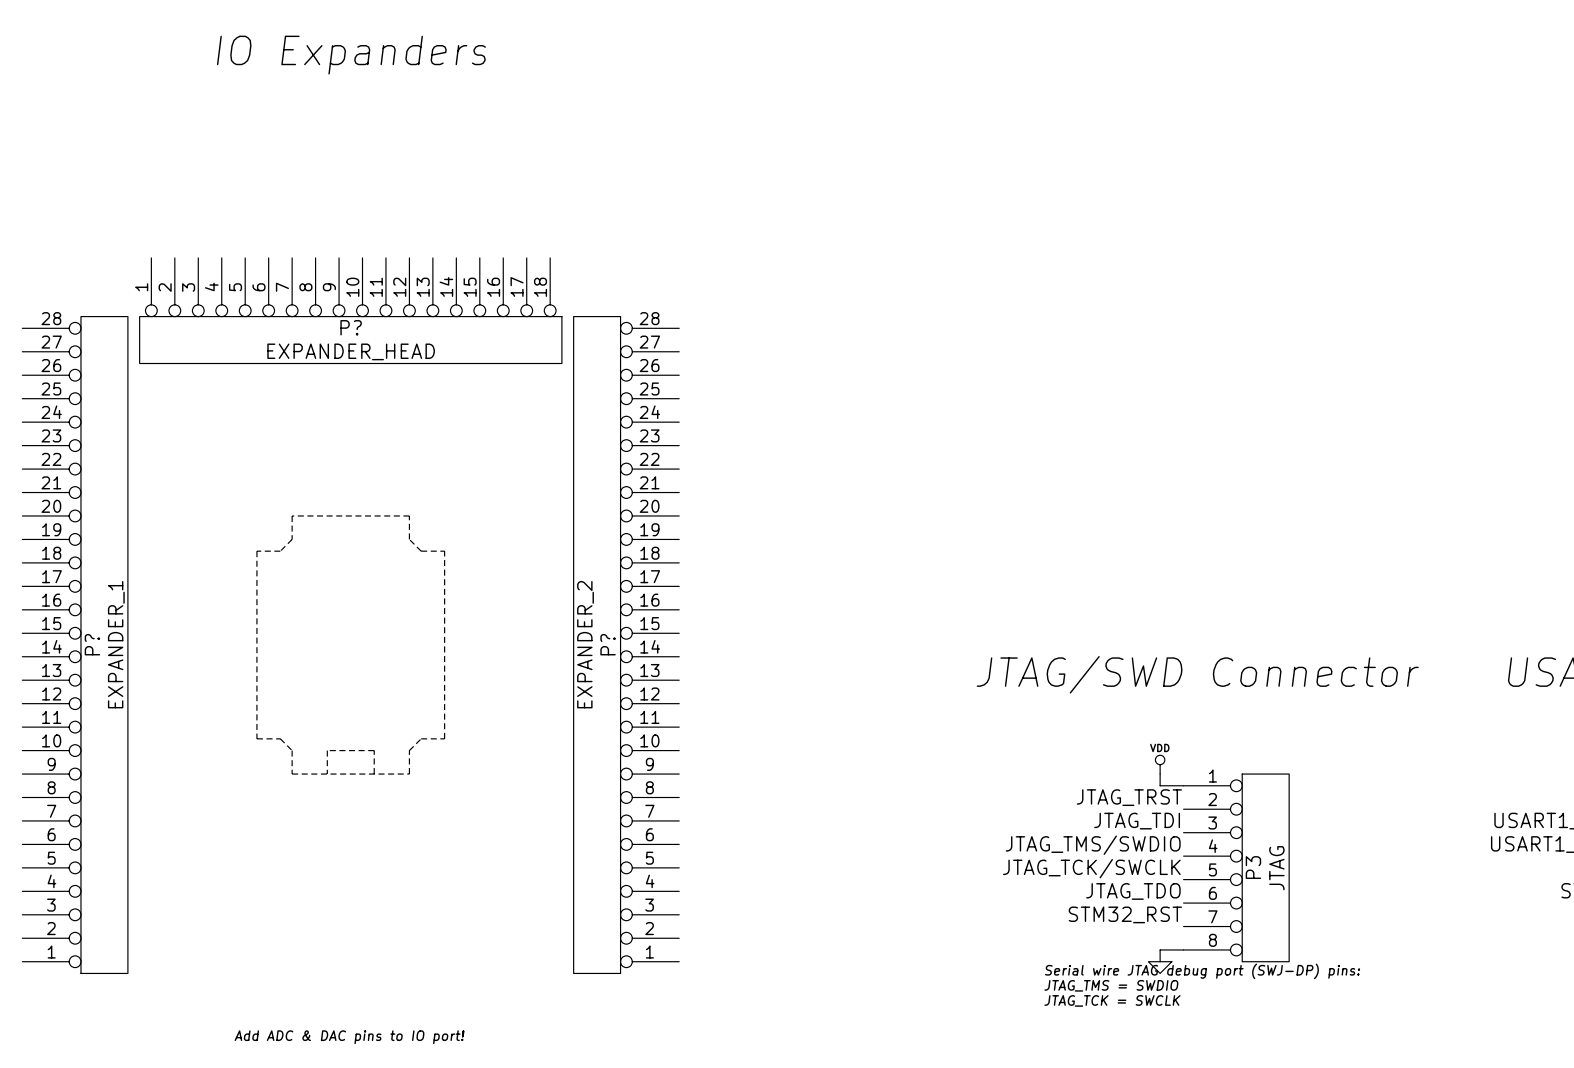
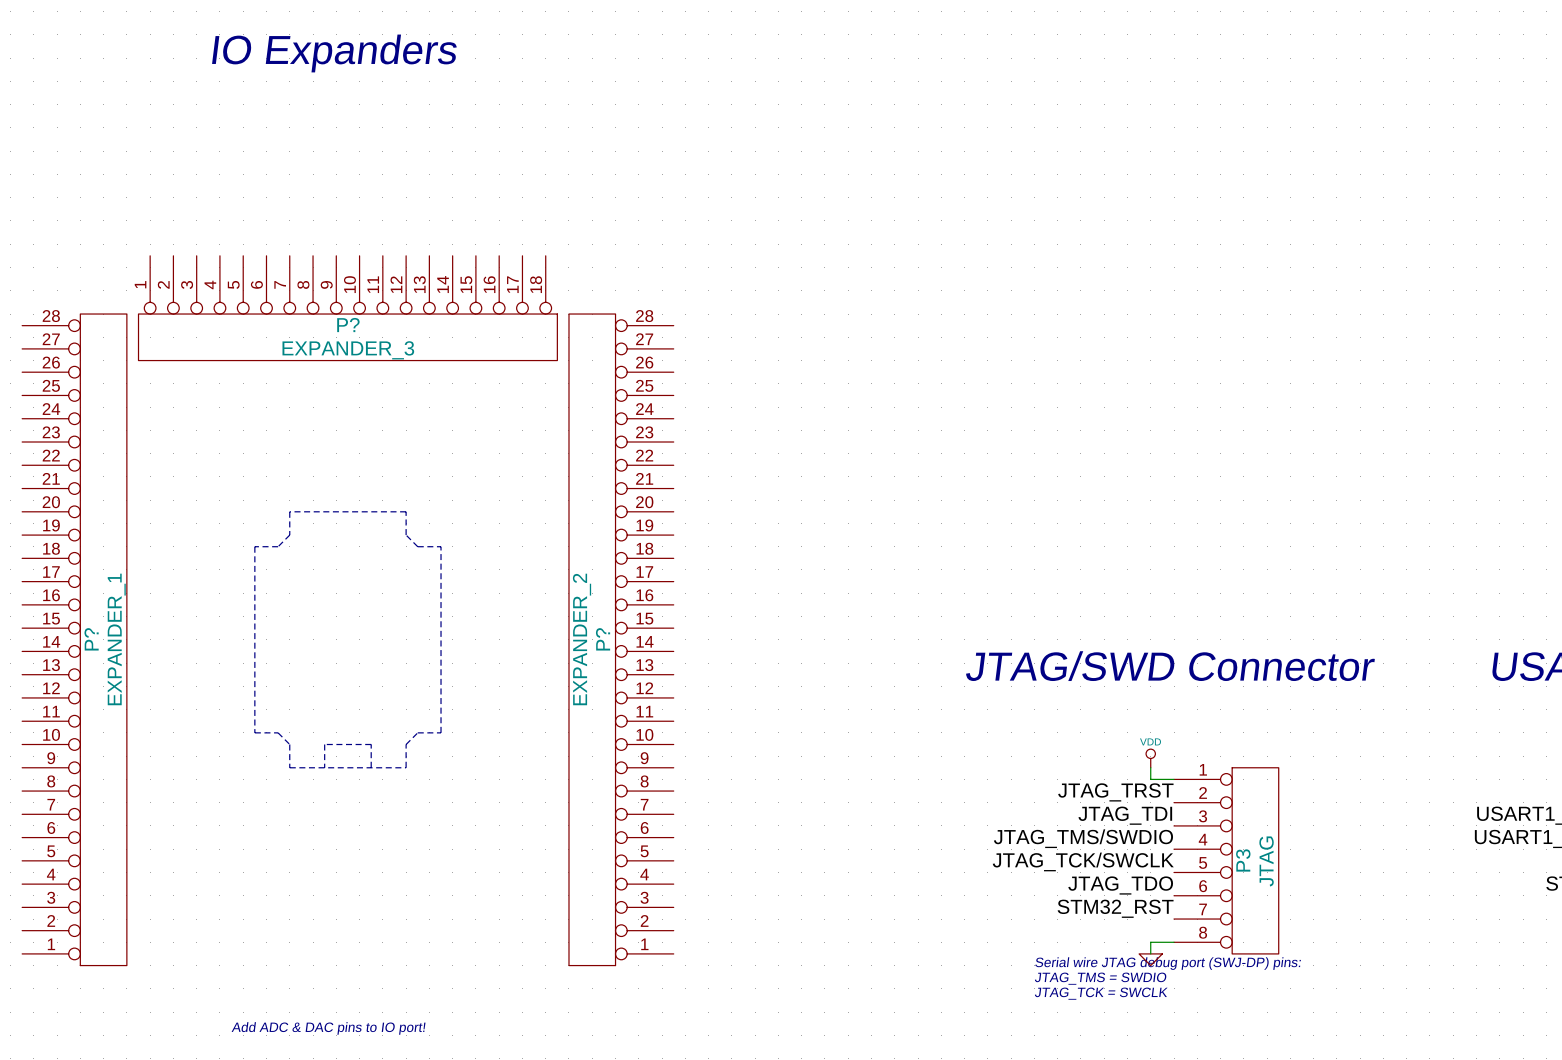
P? value: EXPANDER_HEAD (351, 351) -> EXPANDER_3 (348, 350)

